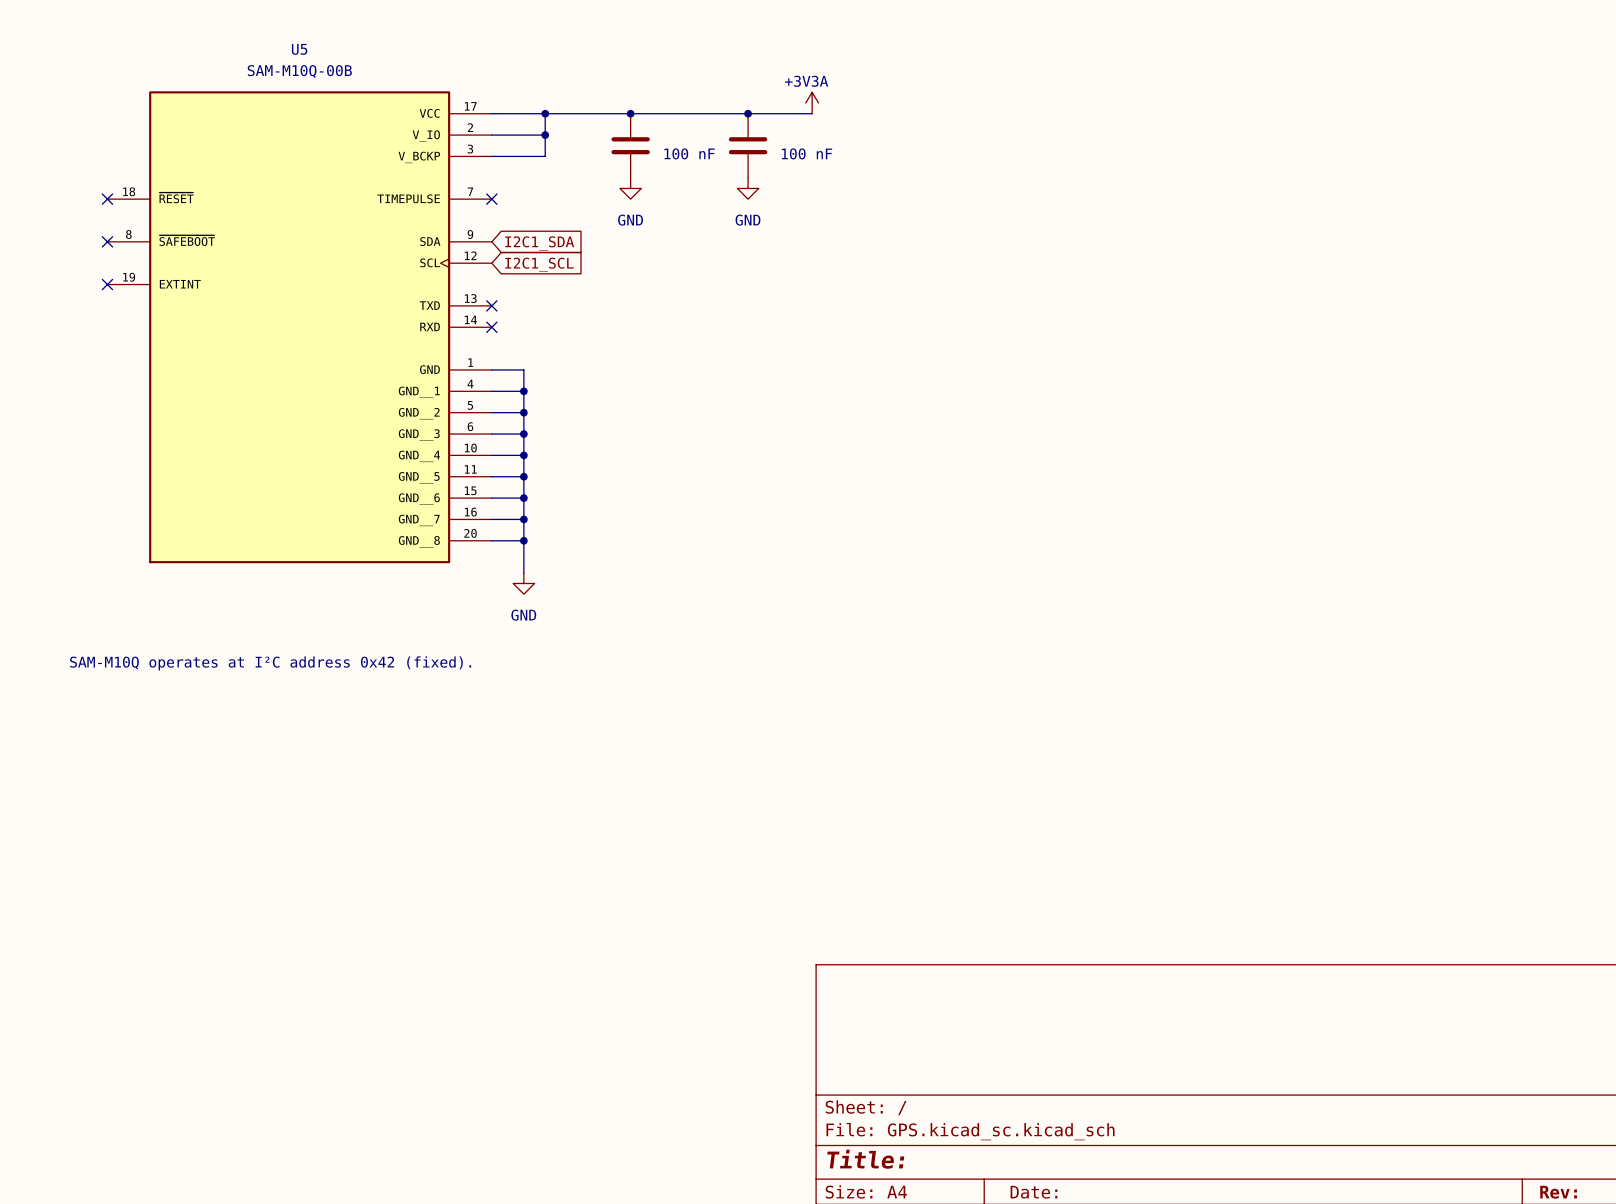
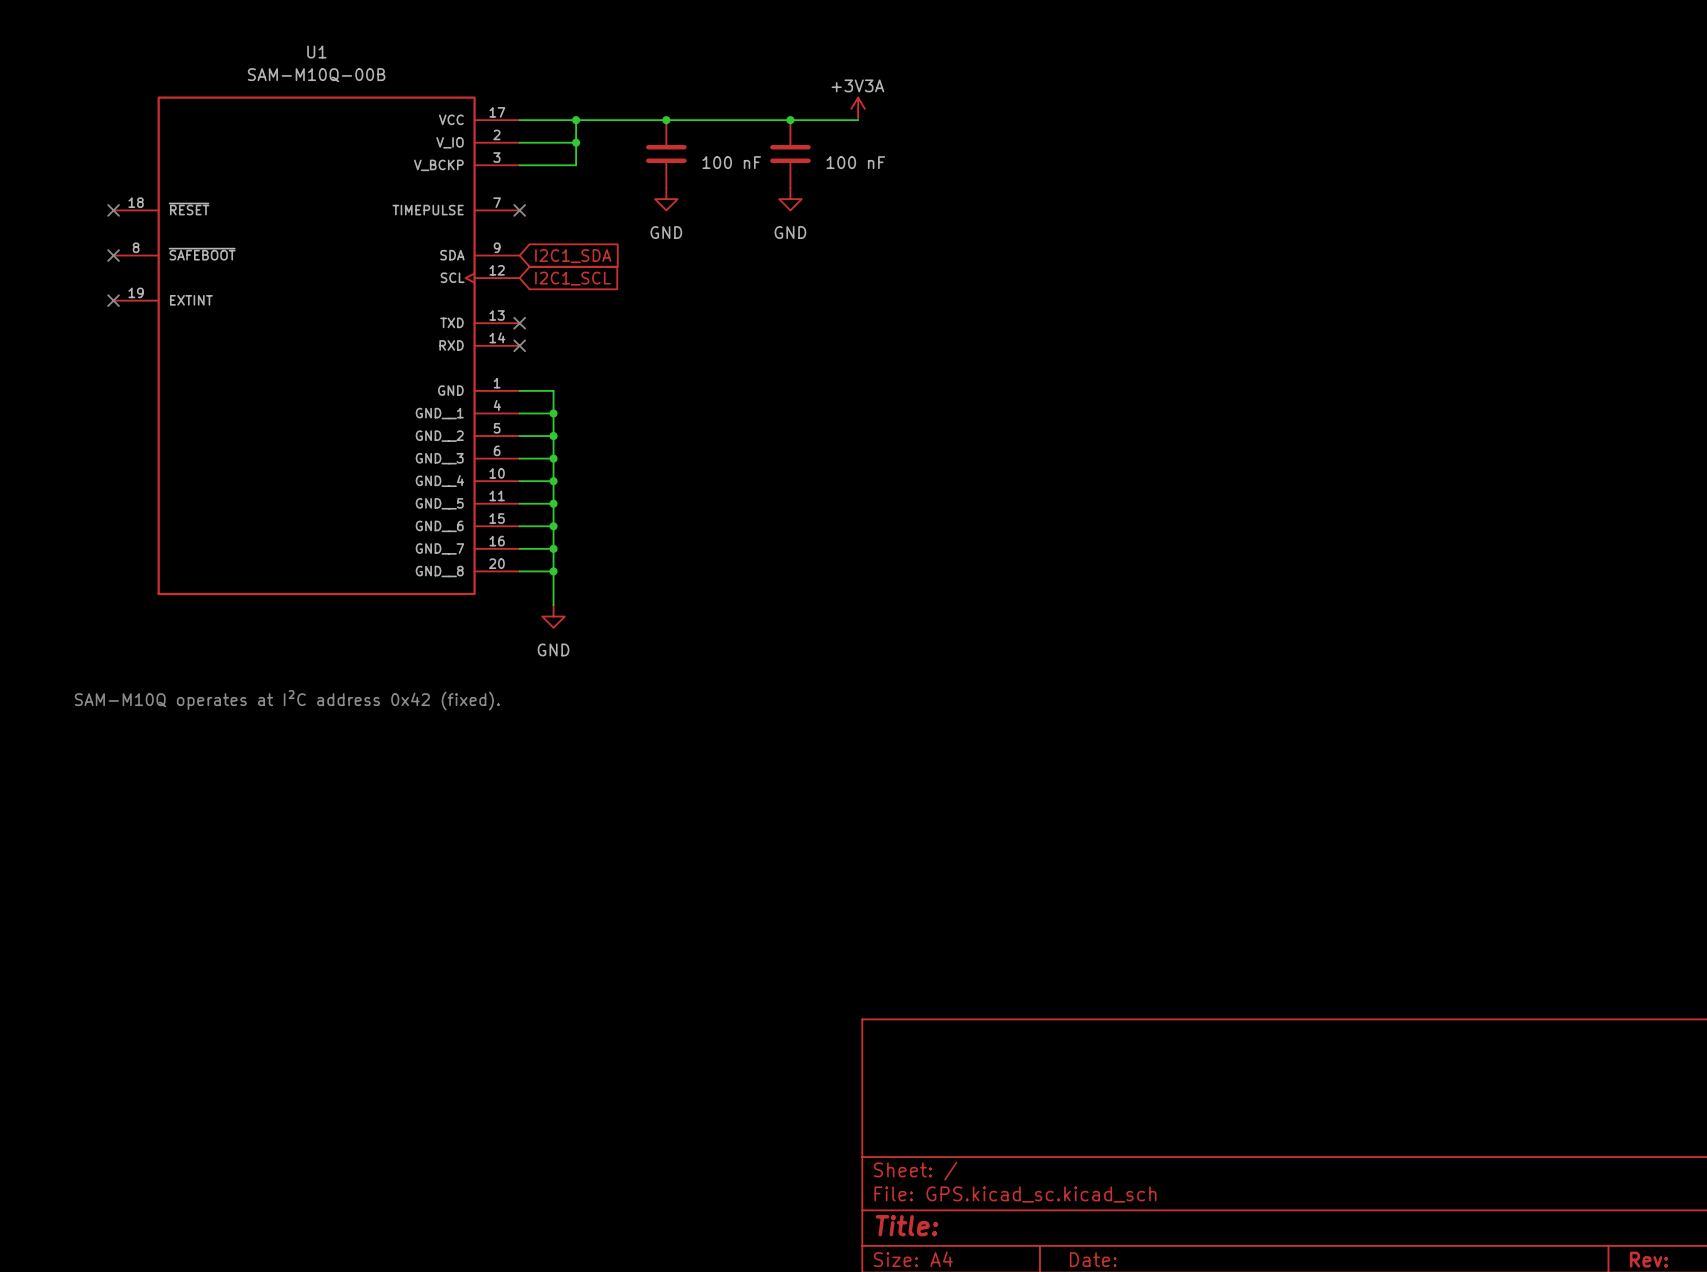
U5 name: U5 (299, 49) -> U1 (316, 52)

